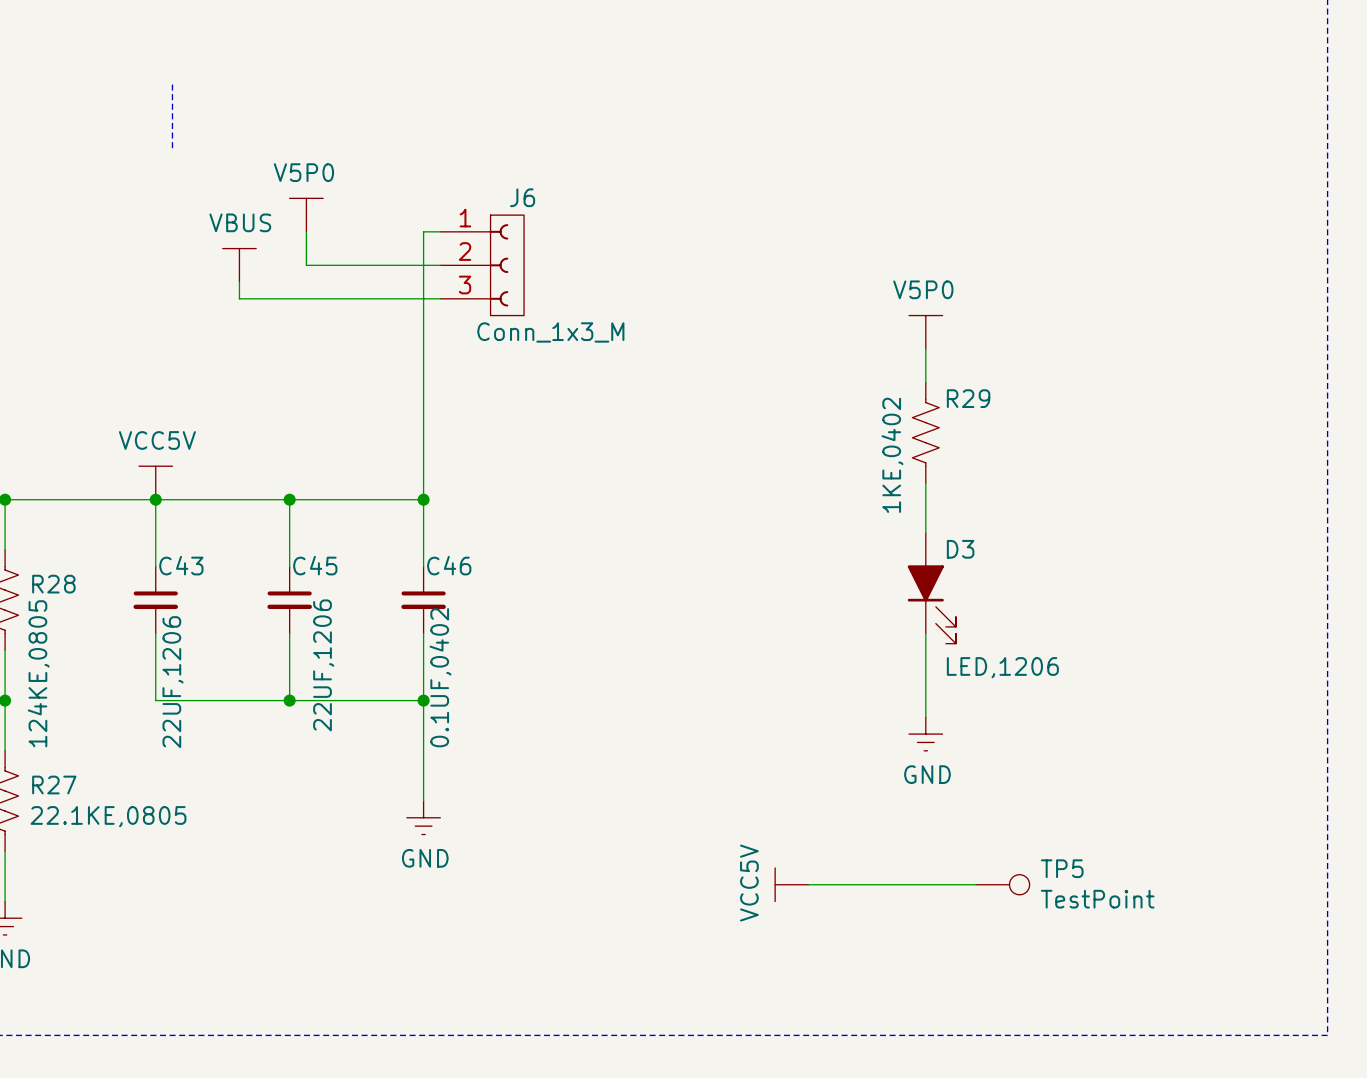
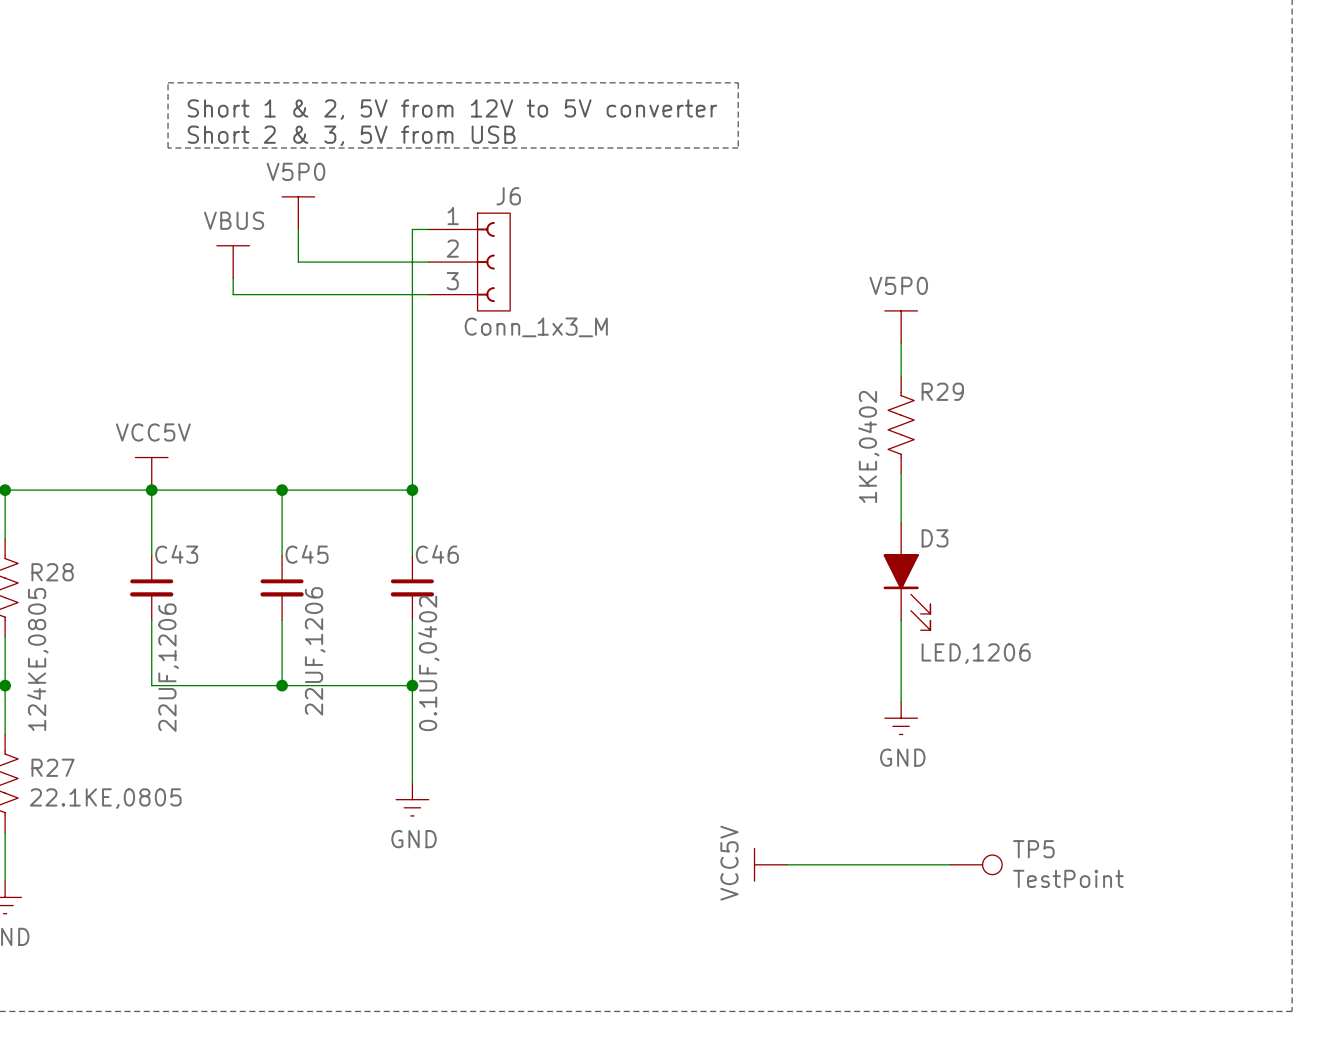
line: none -> (168, 82) (738, 82) (738, 148) (168, 148)
text: none -> Short 1 & 2, 5V from 12V to 5V converter (452, 109)
text: none -> Short 2 & 3, 5V from USB (351, 135)

